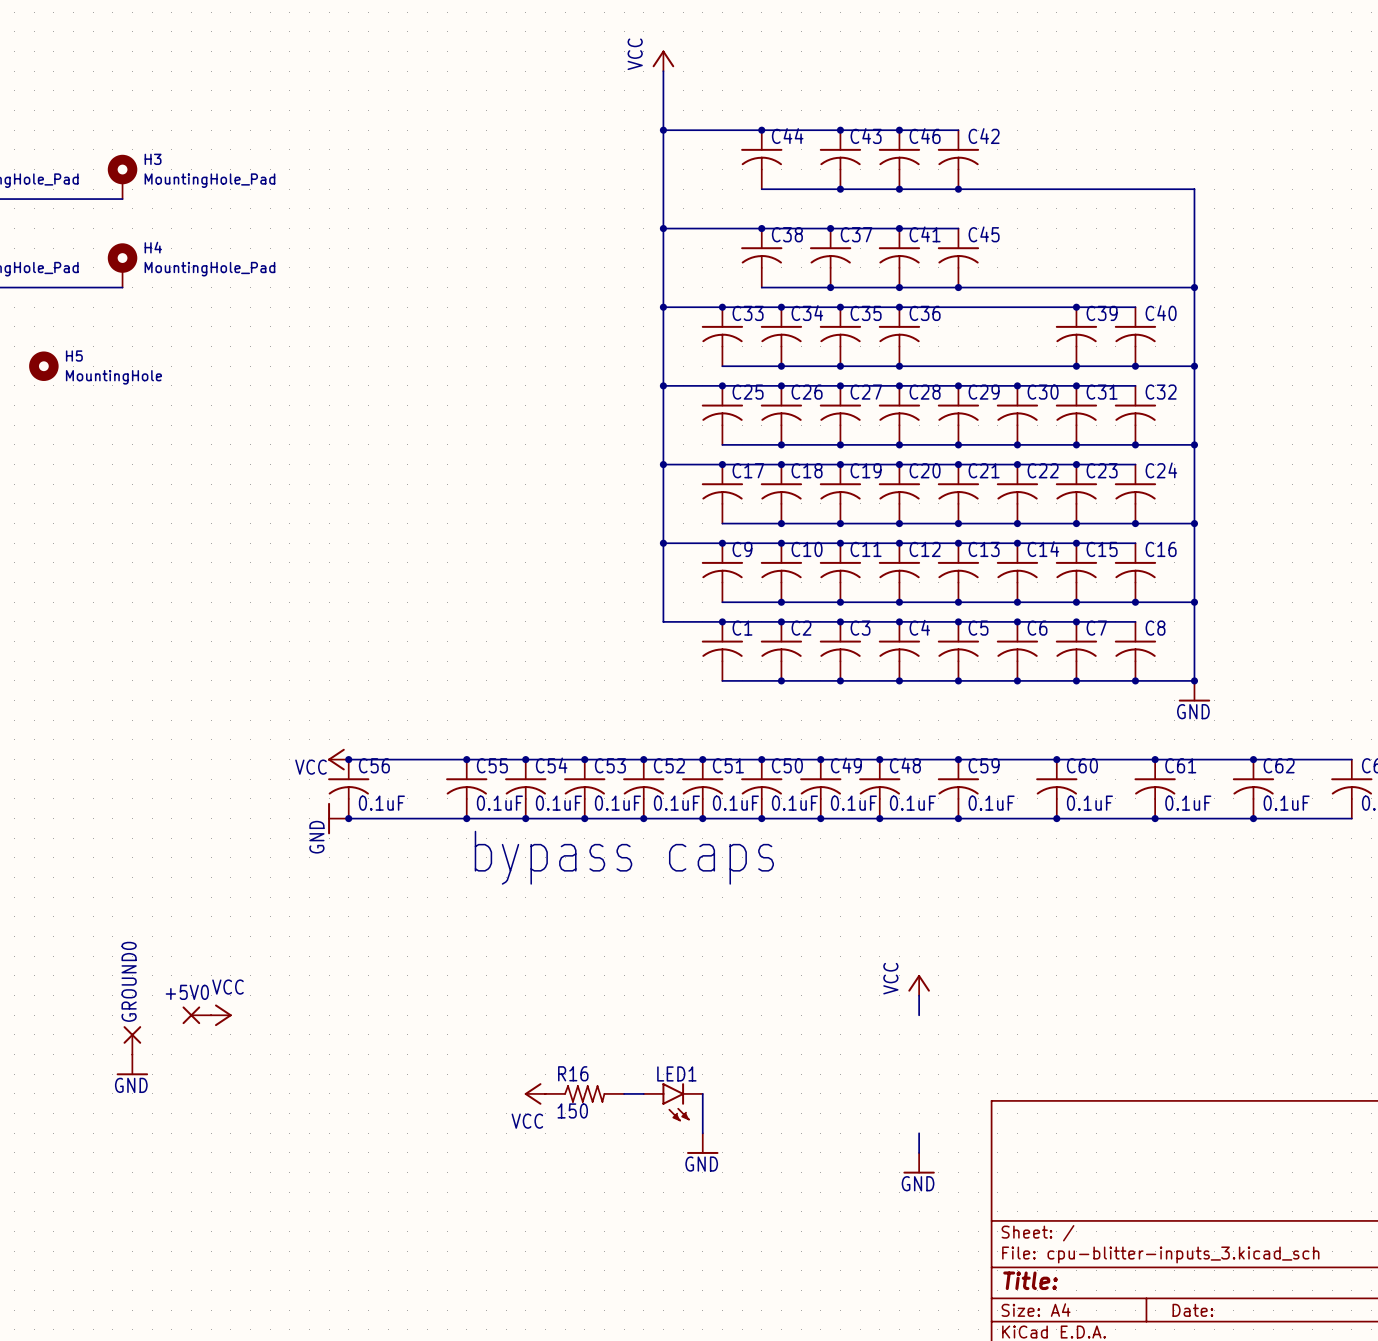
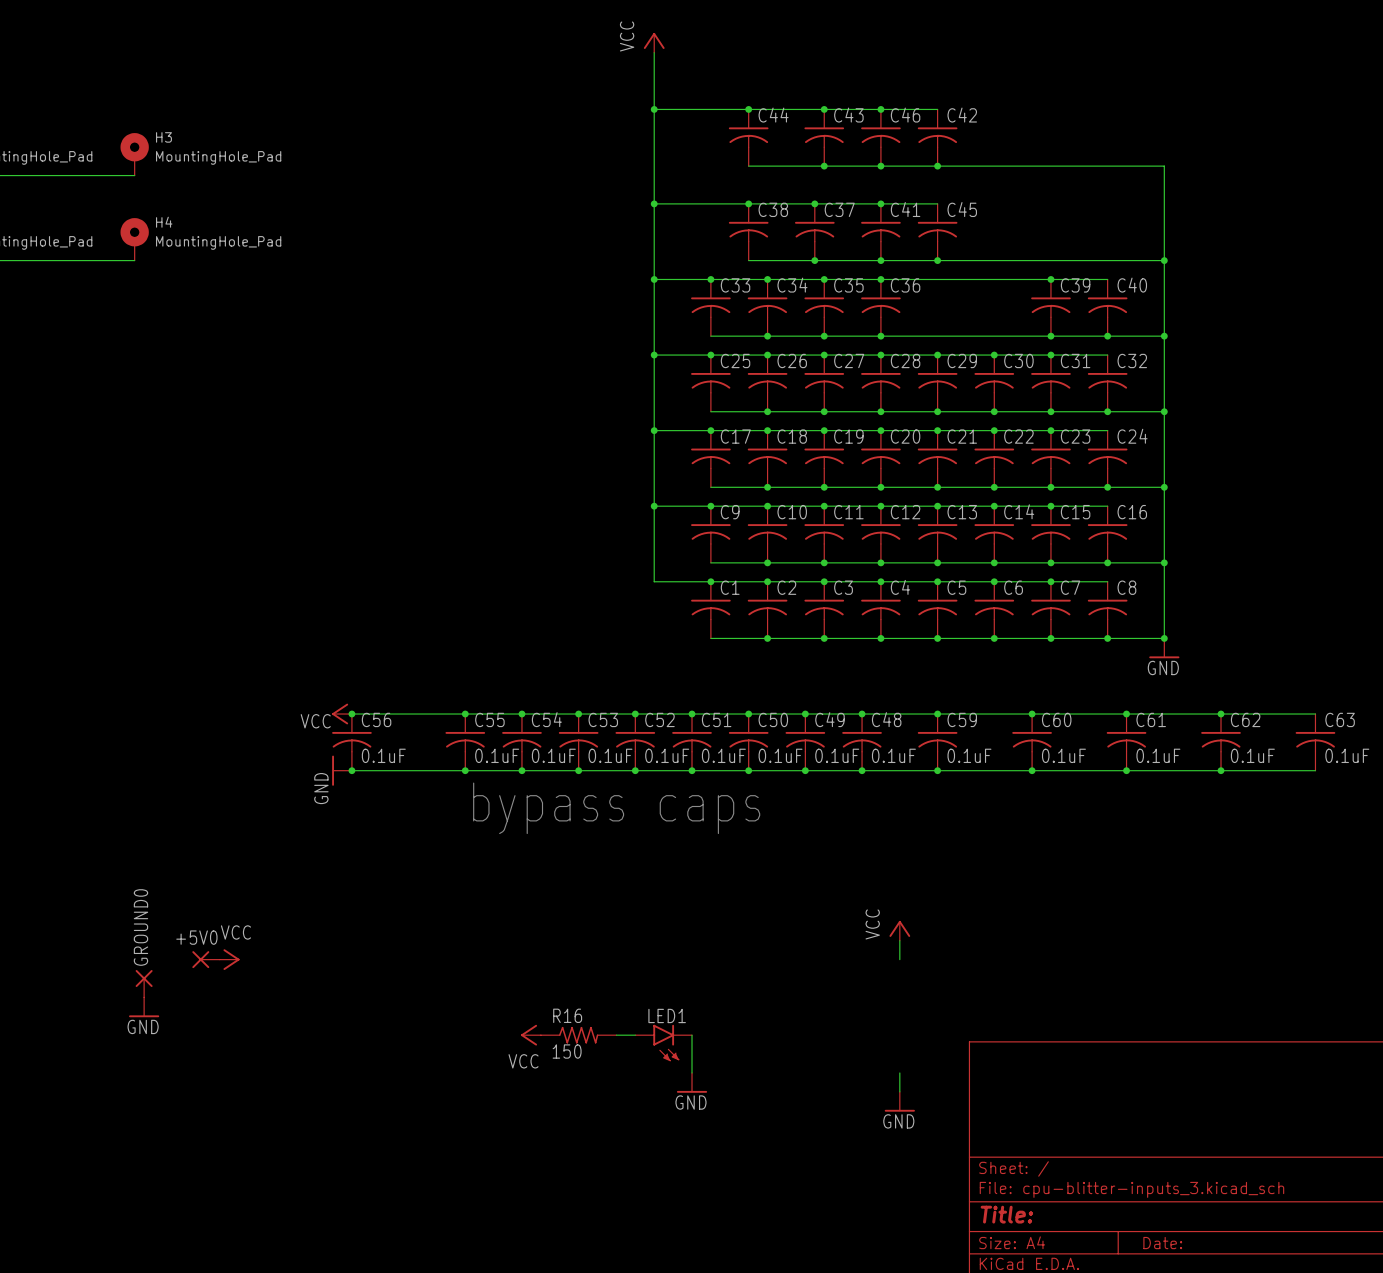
H5: MountingHole (43, 366) -> none

